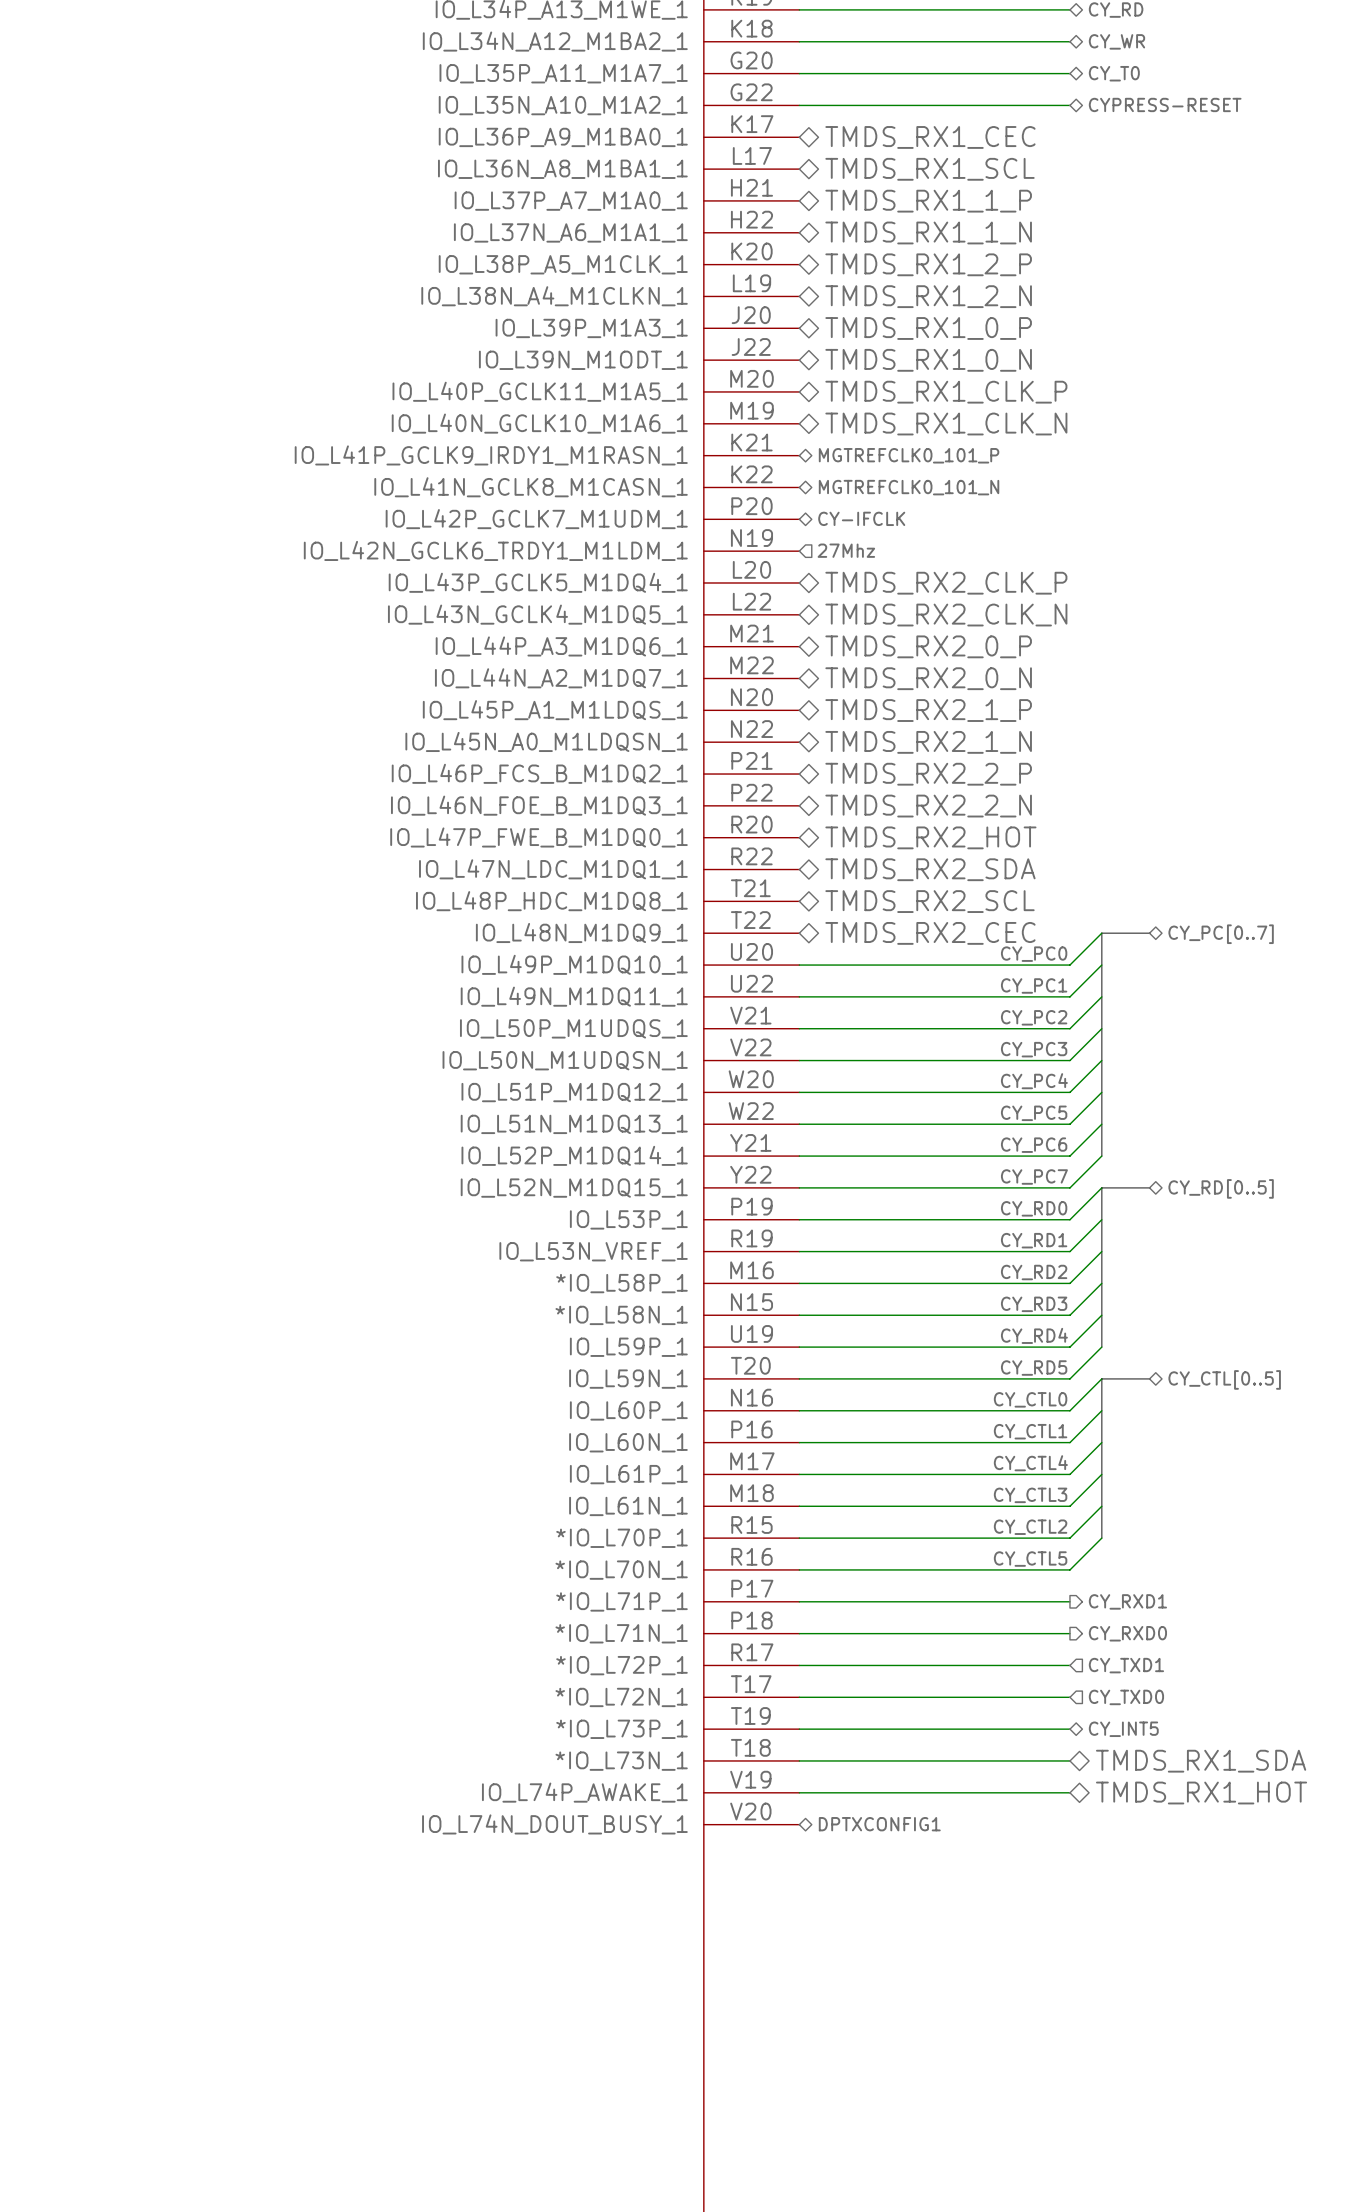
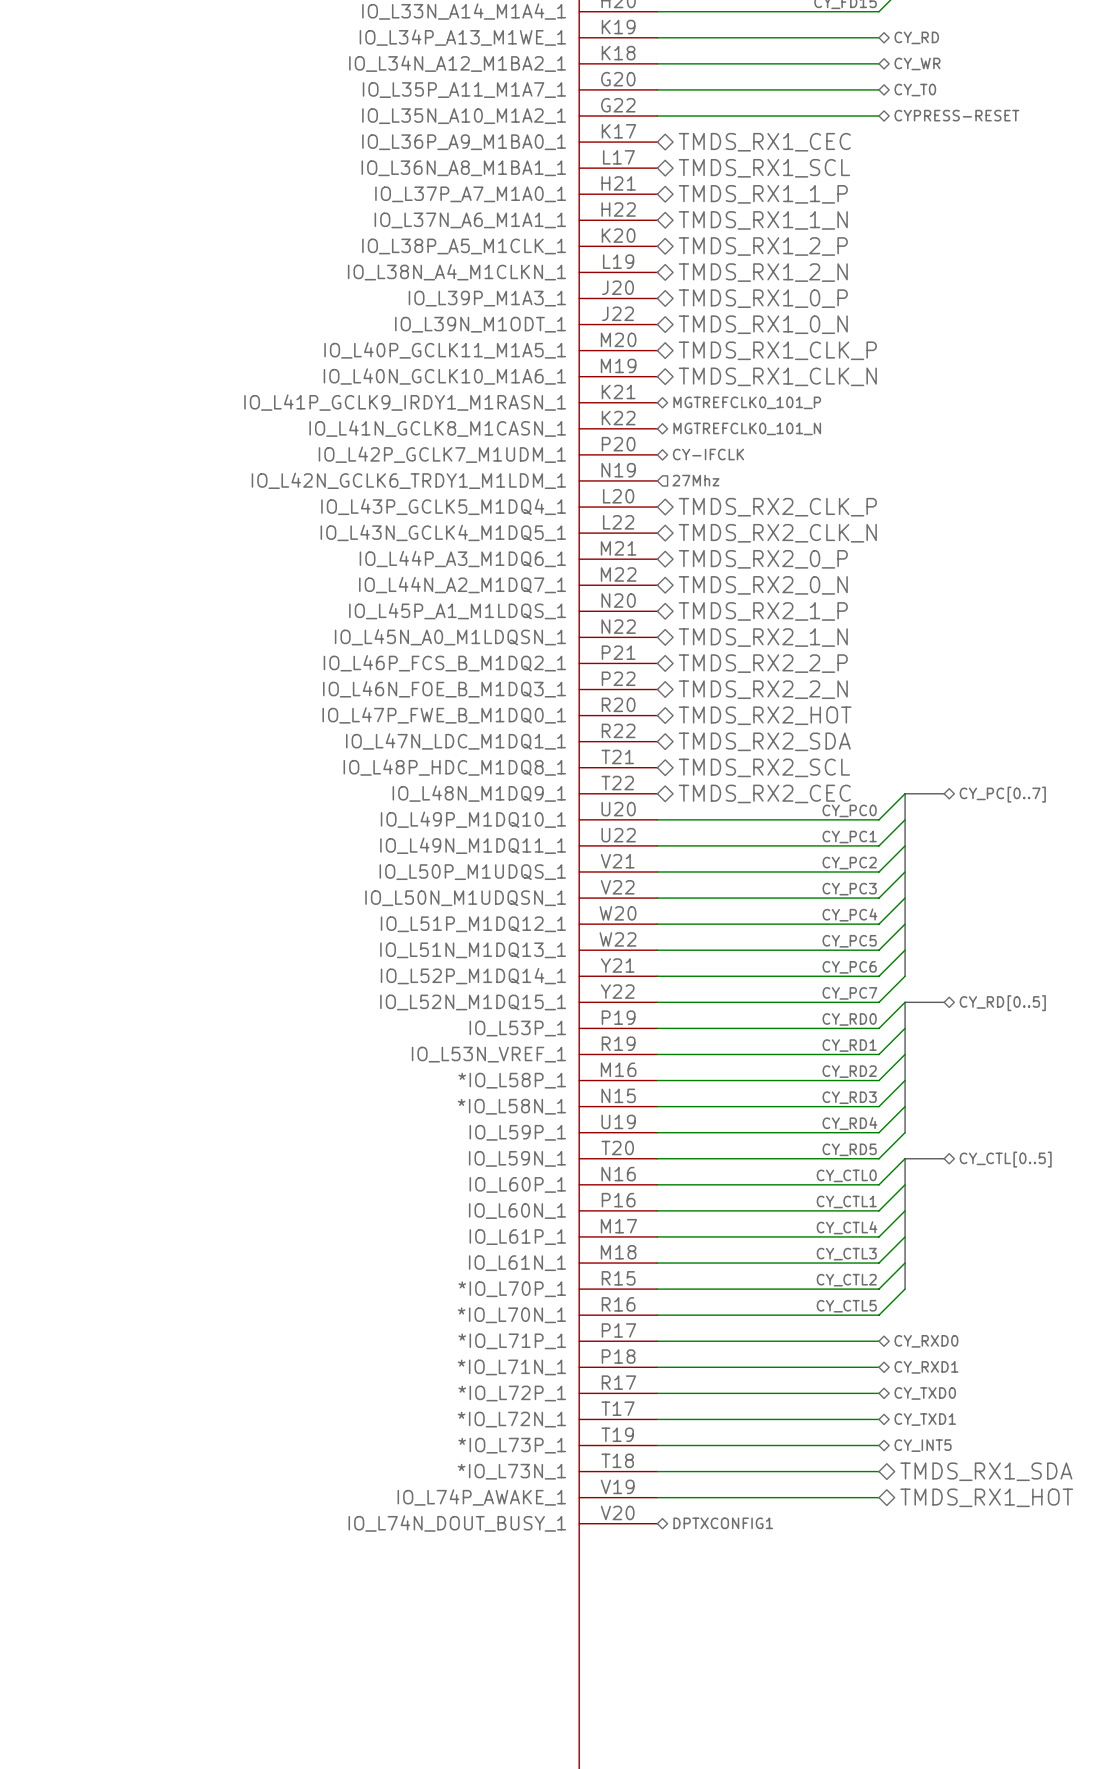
hierarchical label shape: output (1127, 1601) -> bidirectional (926, 1341)
hierarchical label: CY_RXD1 (1127, 1601) -> CY_RXD0 (926, 1341)
hierarchical label shape: output (1127, 1633) -> bidirectional (926, 1367)
hierarchical label: CY_RXD0 (1127, 1633) -> CY_RXD1 (926, 1367)
hierarchical label shape: input (1126, 1665) -> bidirectional (925, 1393)
hierarchical label: CY_TXD1 (1126, 1665) -> CY_TXD0 (925, 1393)
hierarchical label shape: input (1126, 1697) -> bidirectional (925, 1419)
hierarchical label: CY_TXD0 (1126, 1697) -> CY_TXD1 (925, 1419)

